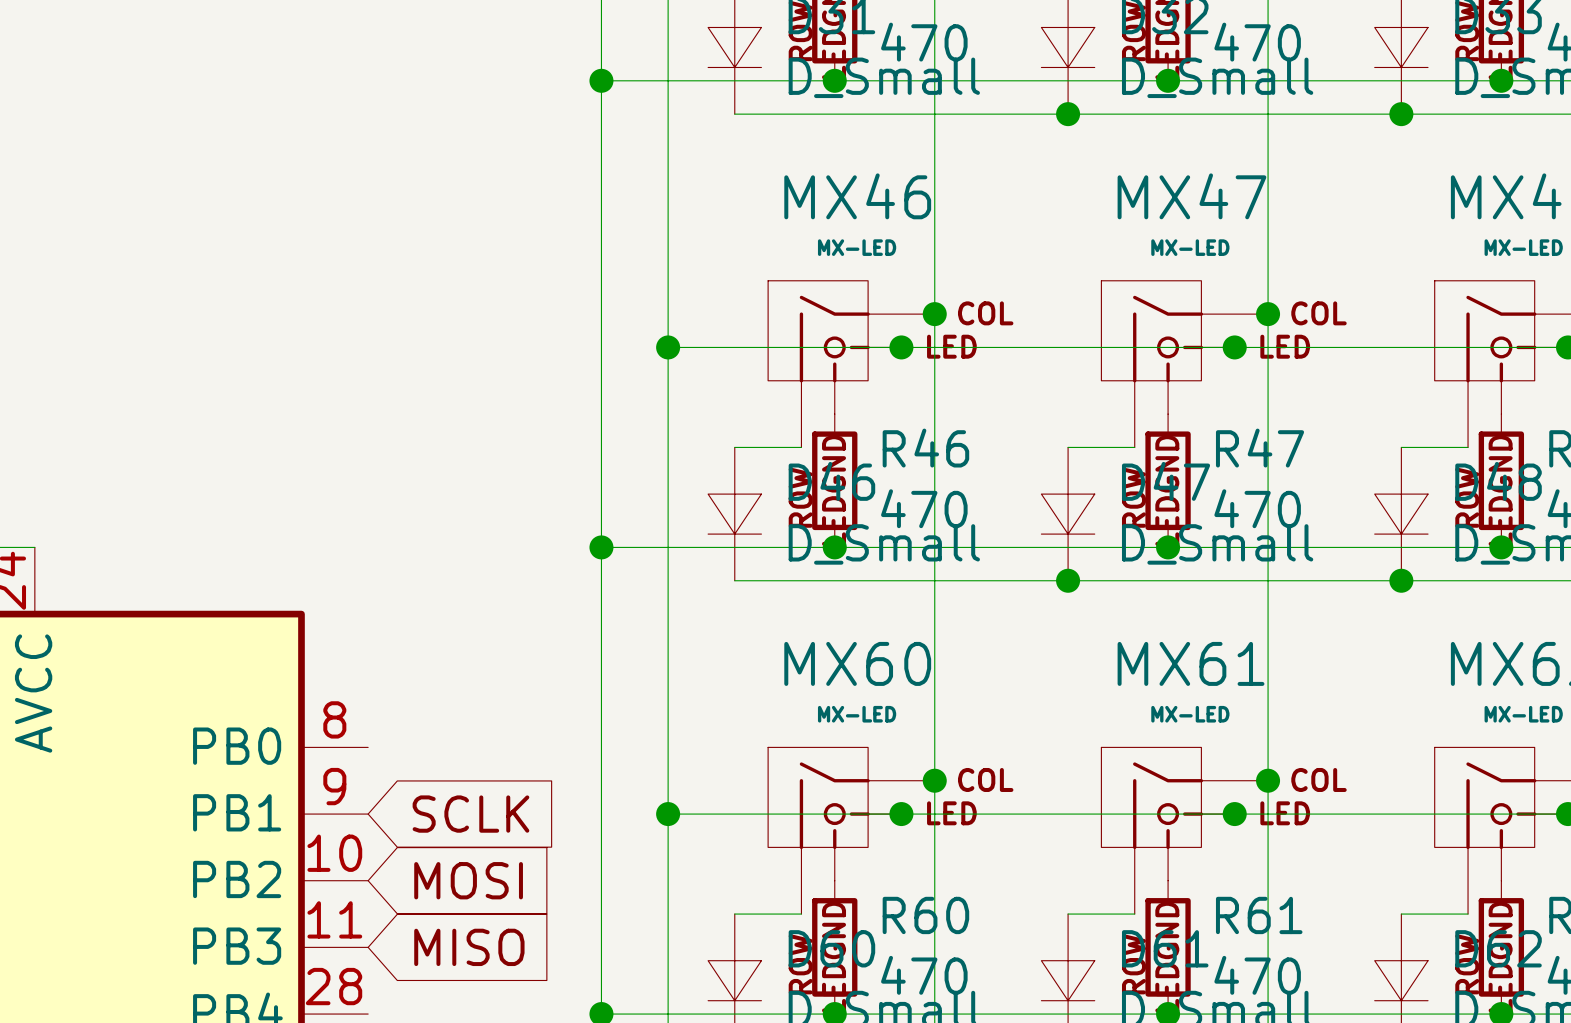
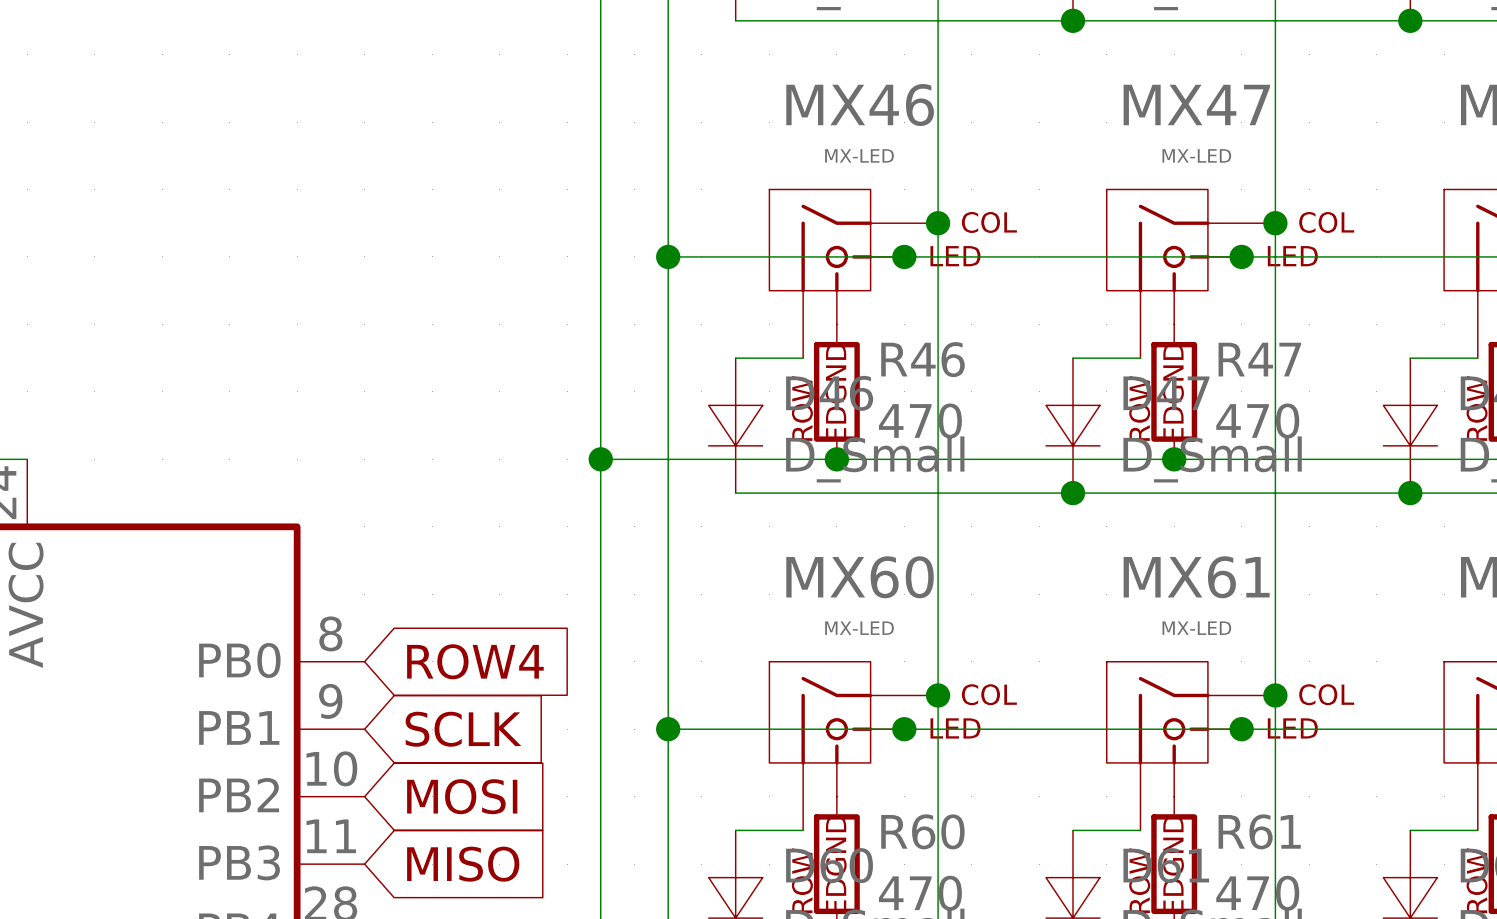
global label: none -> ROW4 (475, 661)

